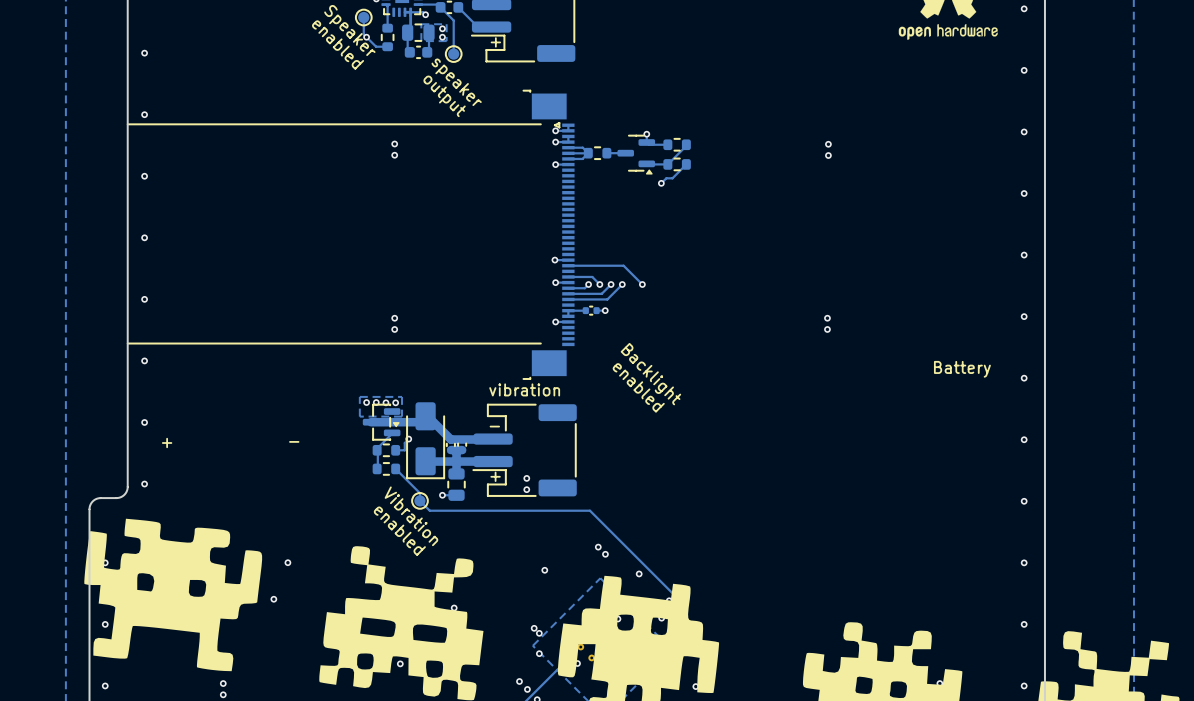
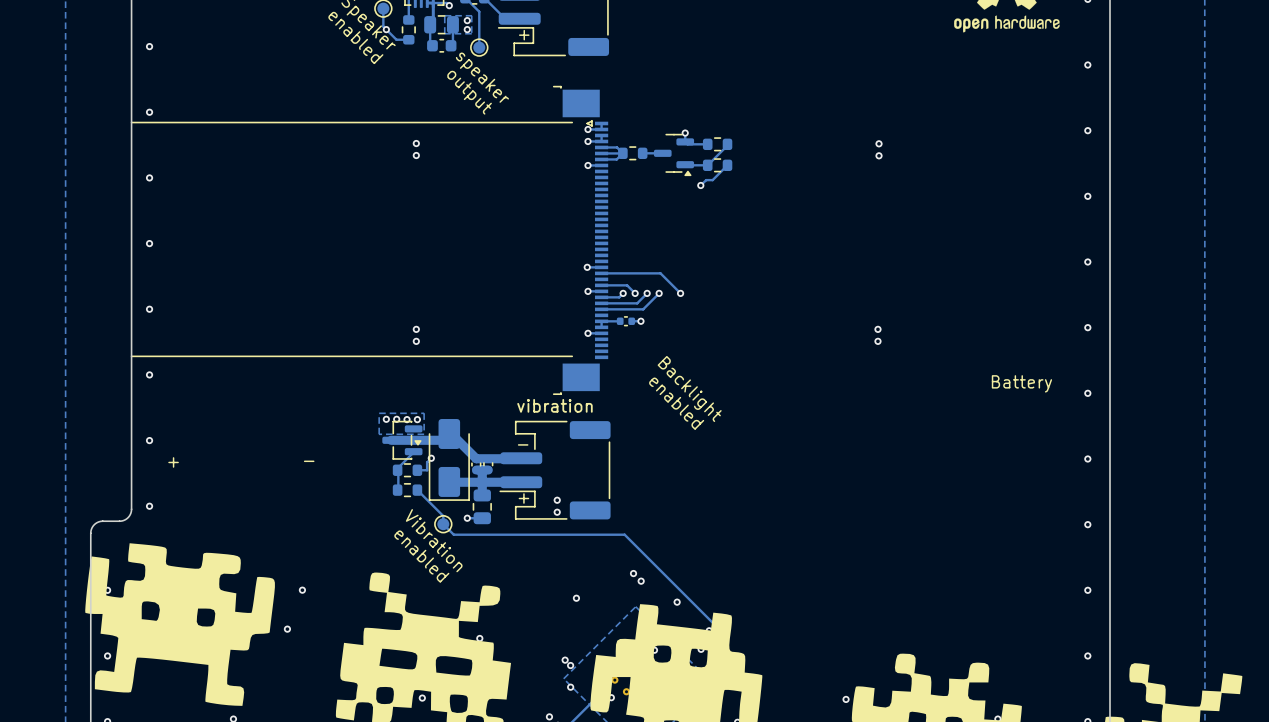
via: none -> (846, 699)

